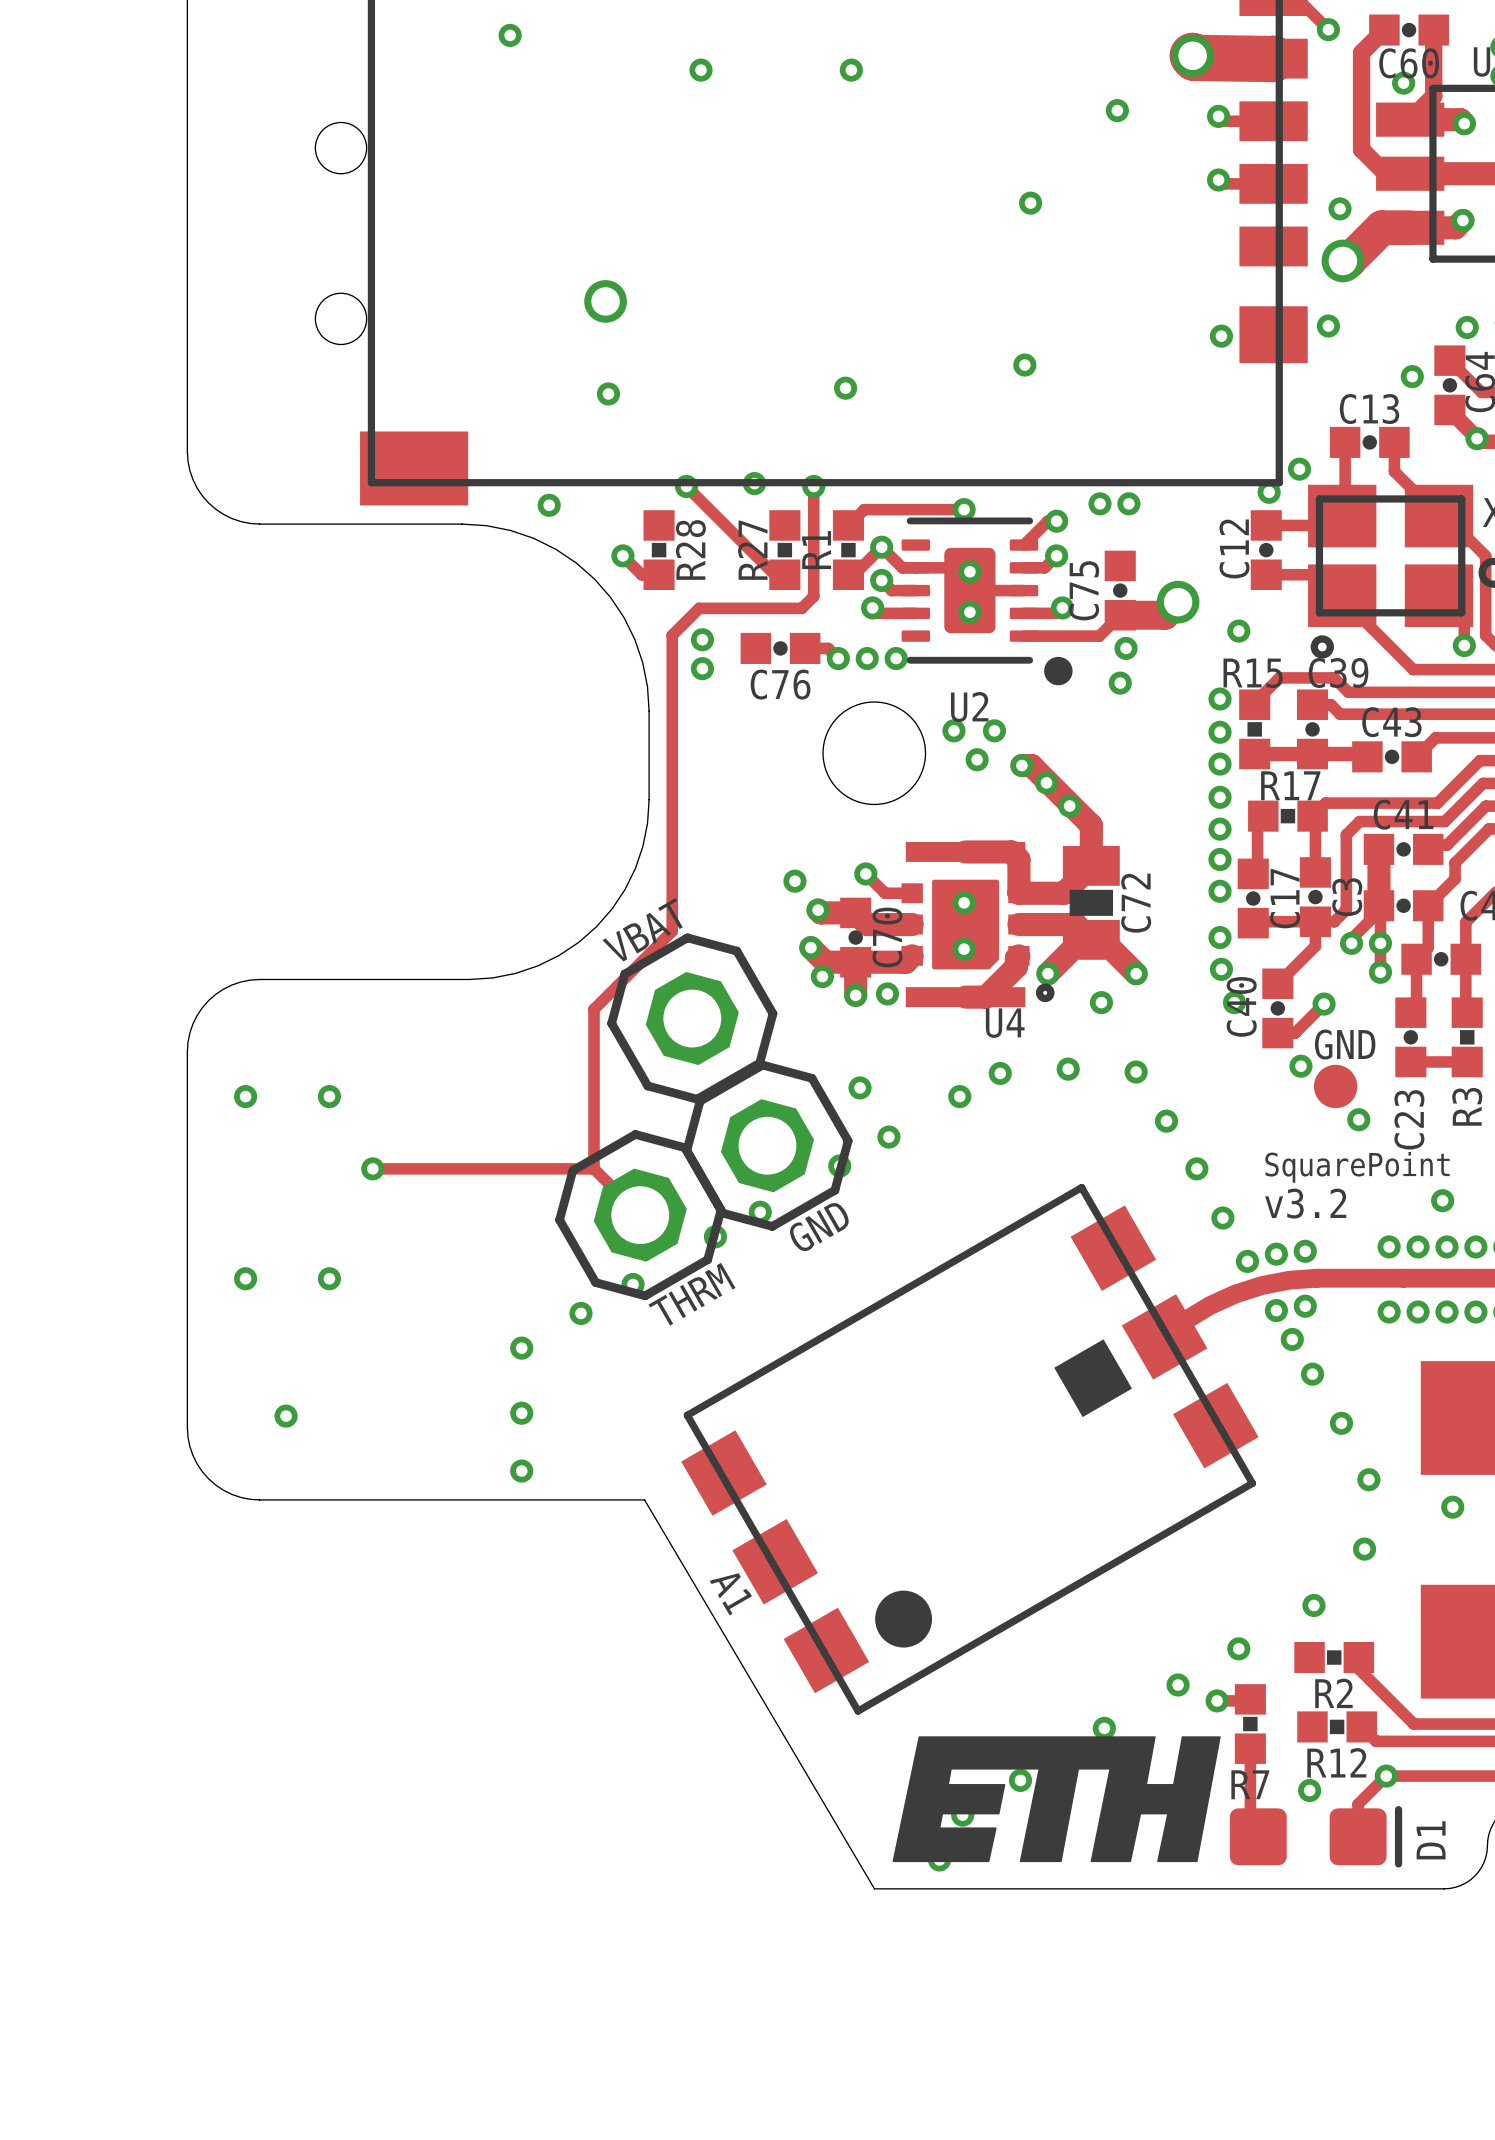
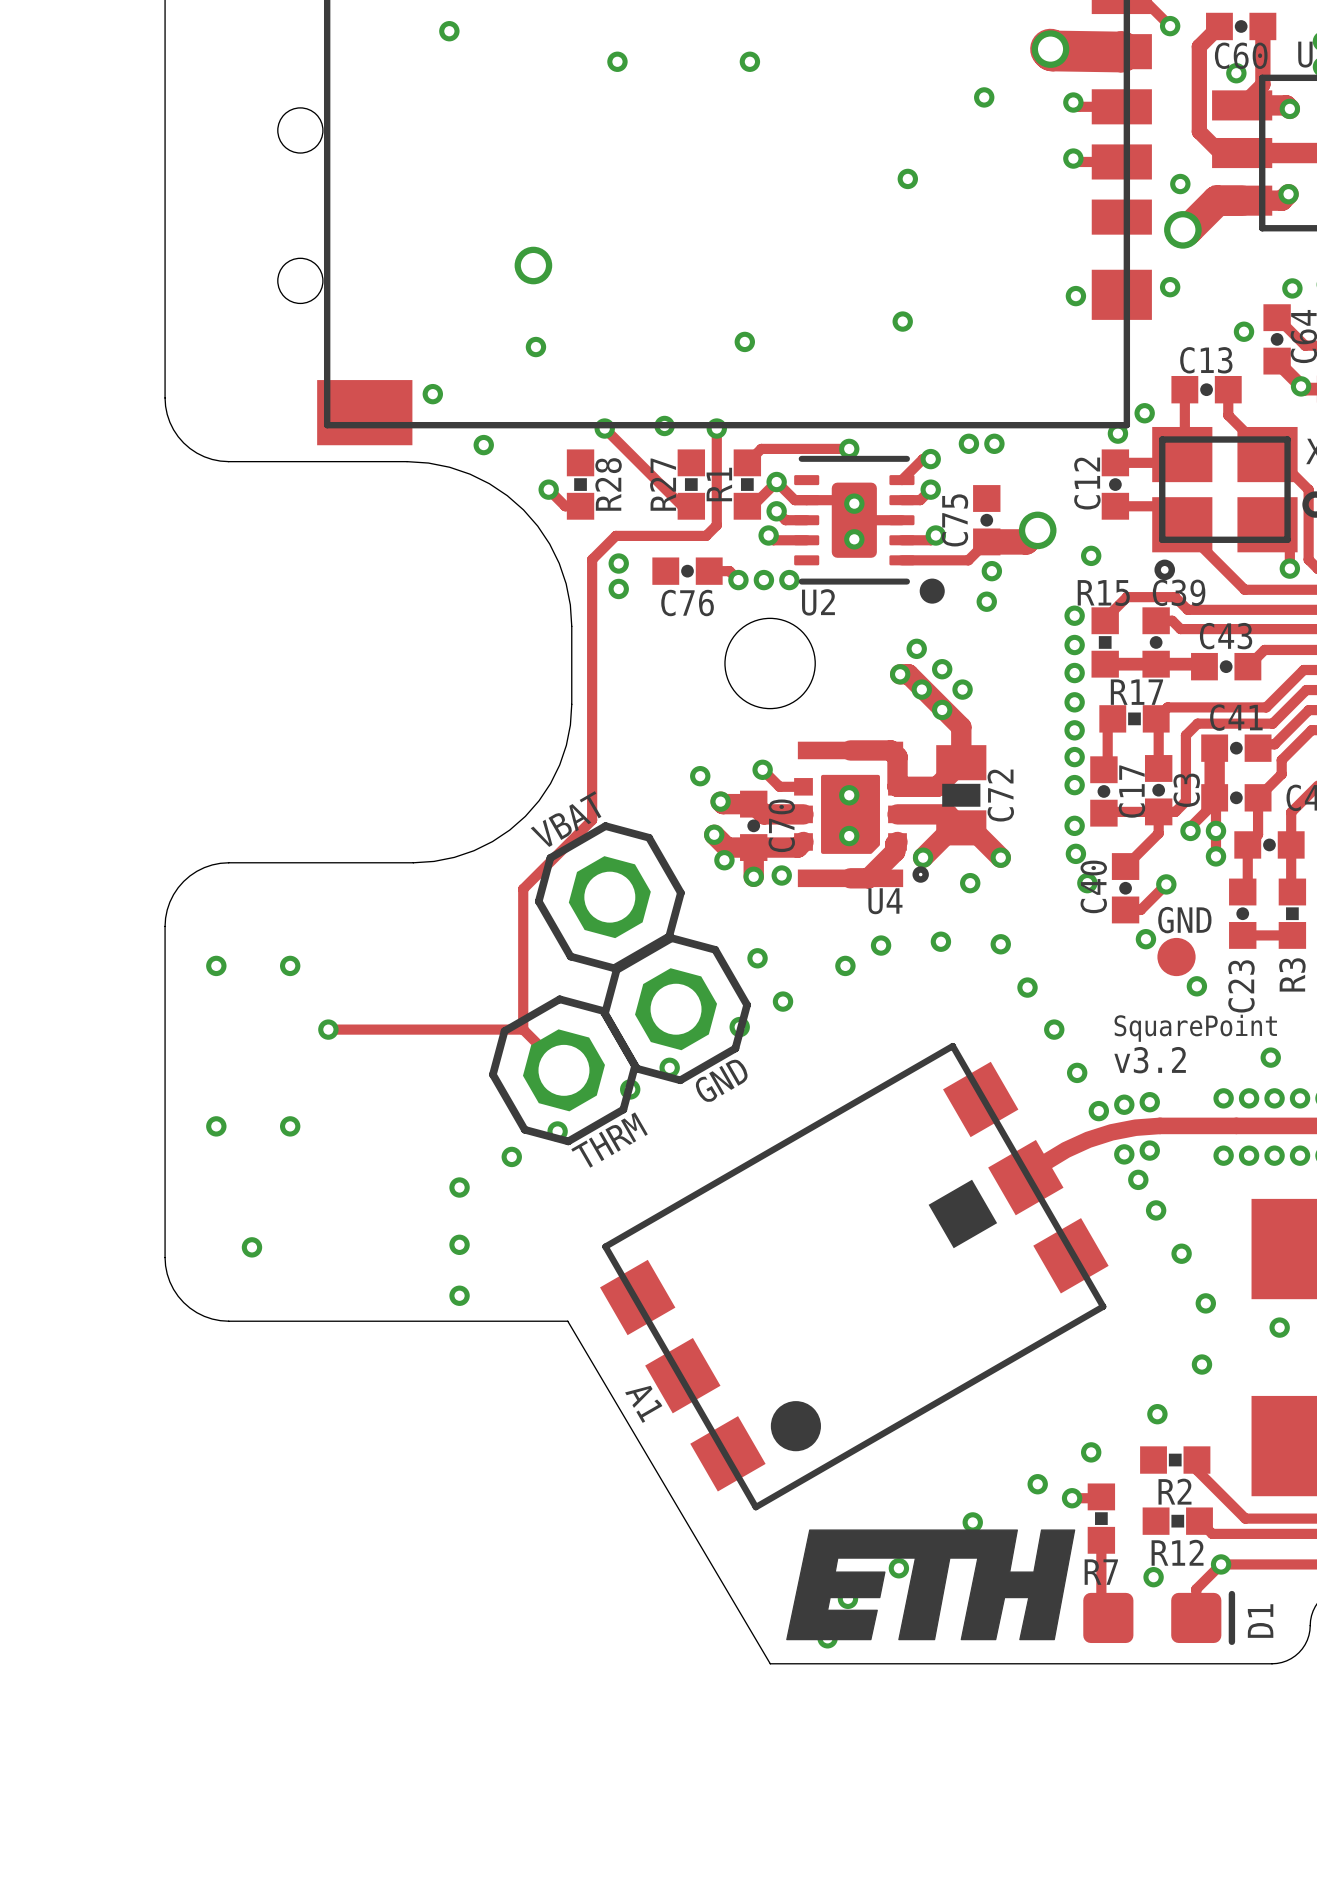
via: none -> (432, 394)
U2 name position: U2 (969, 707) -> U2 (818, 602)
via: (953, 730) -> none
via: (994, 730) -> none
via: none -> (916, 648)
via: (977, 759) -> none
via: none -> (942, 669)
via: none -> (962, 689)

